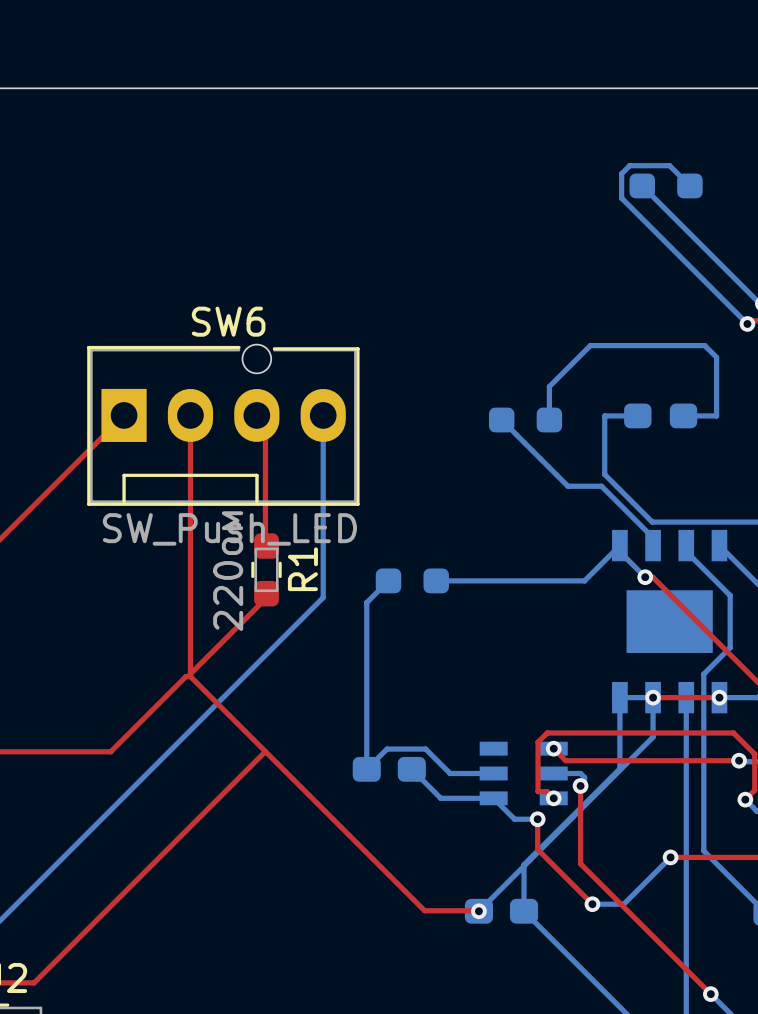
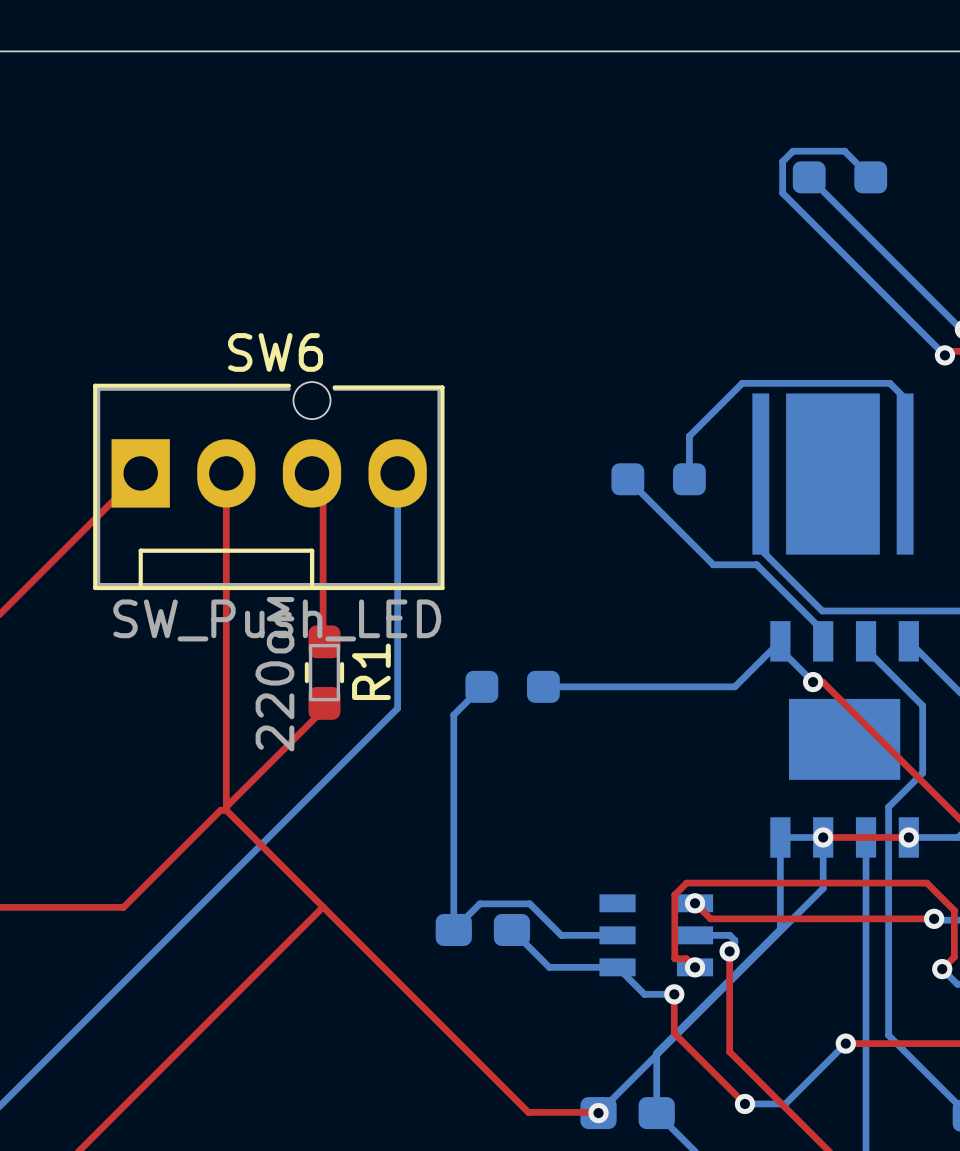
part footprint: [624, 403, 698, 429] -> [752, 393, 914, 555]
bottom track: (604, 415) (637, 415) -> none
bottom track: (683, 415) (716, 415) -> none

